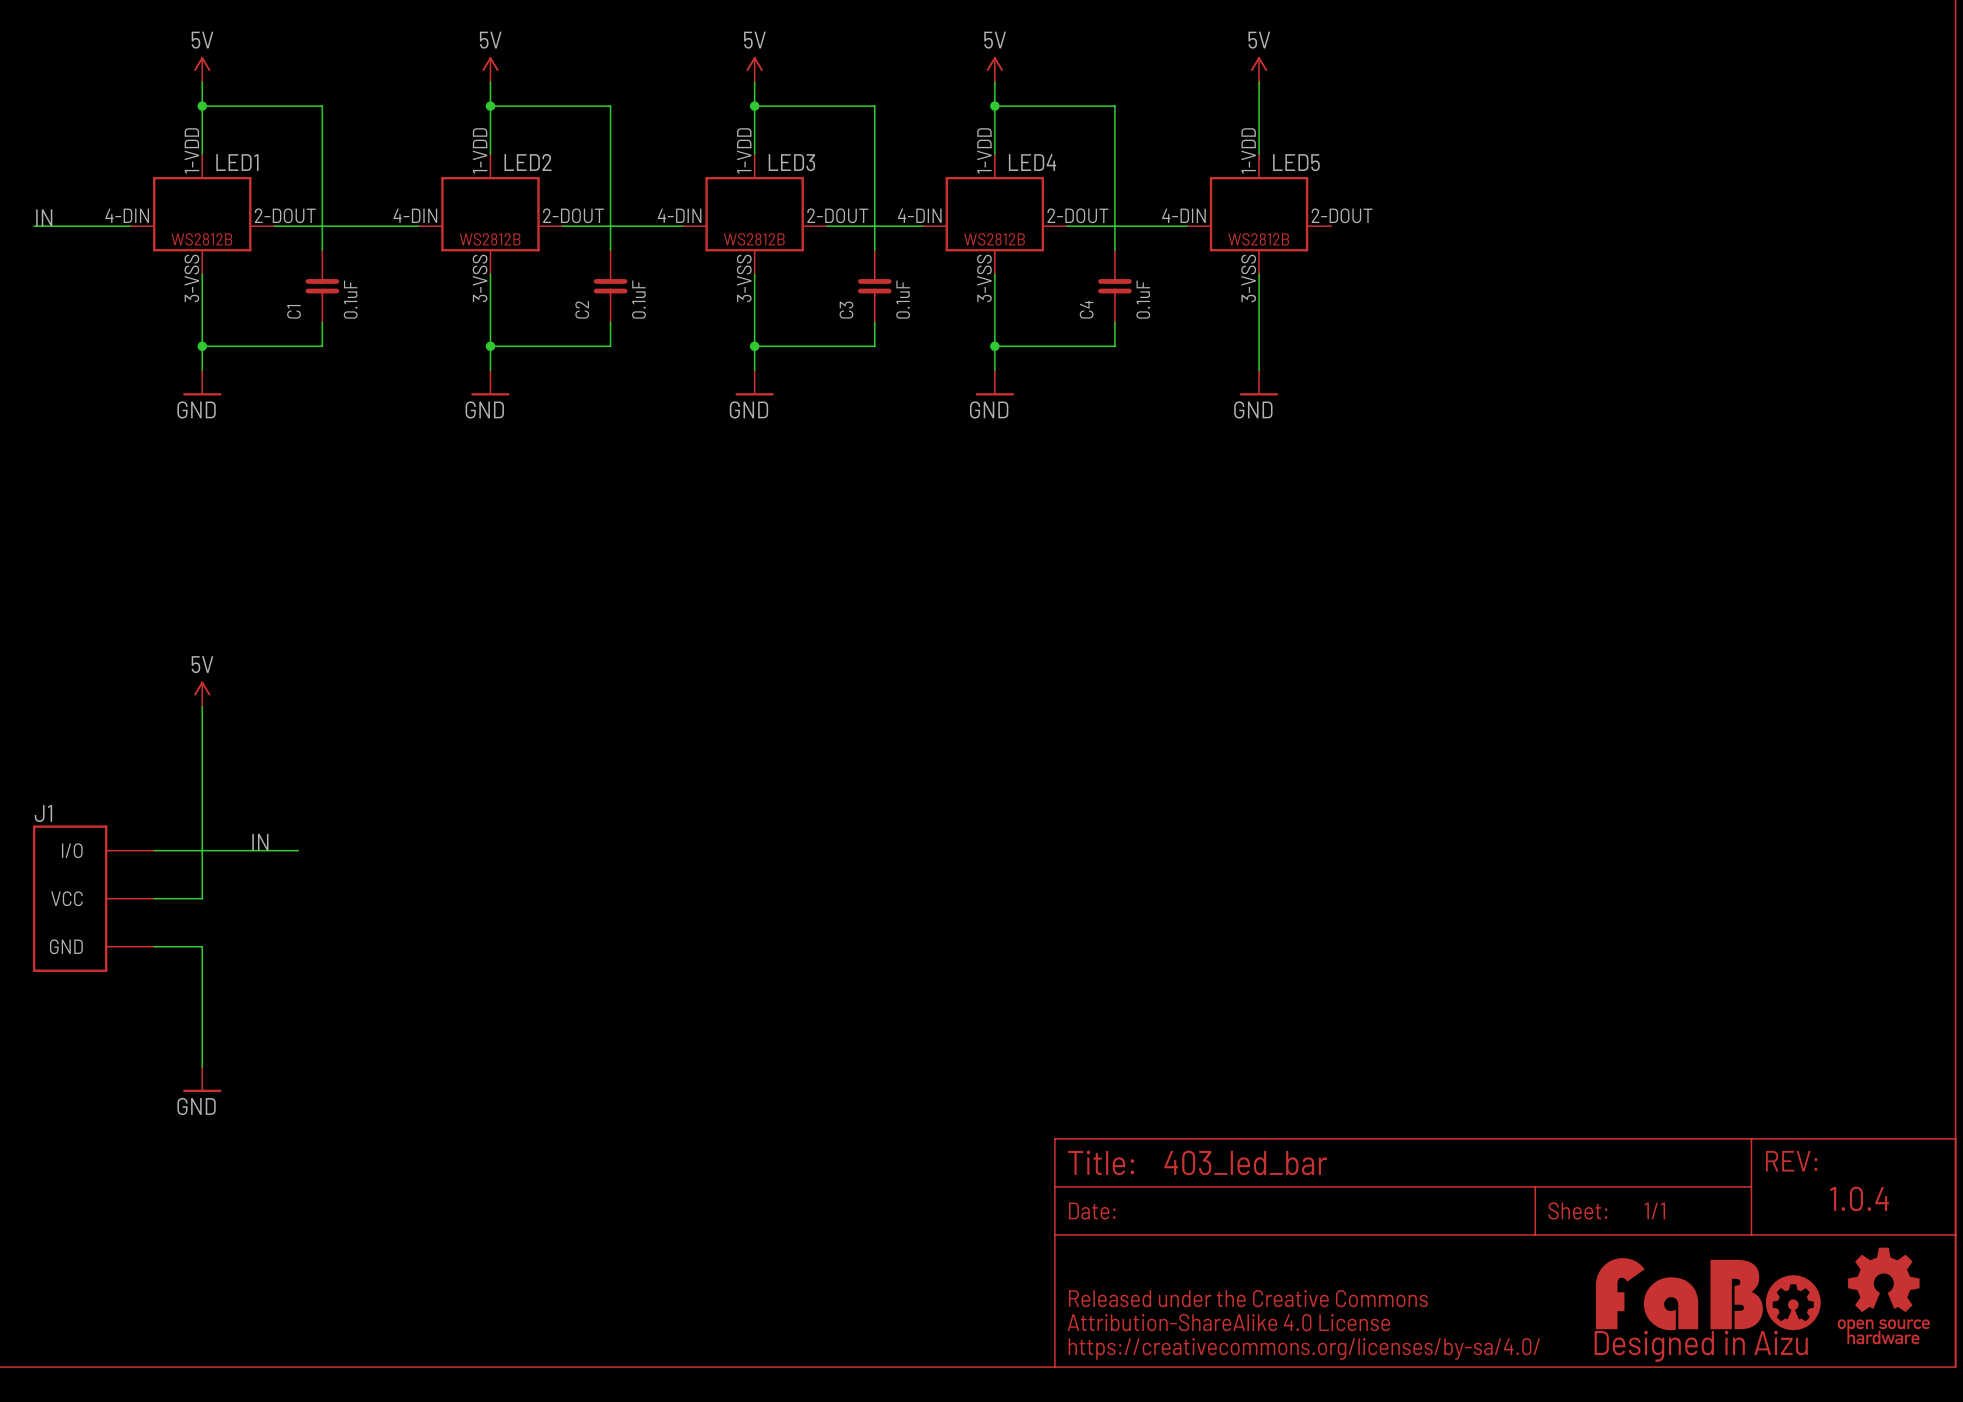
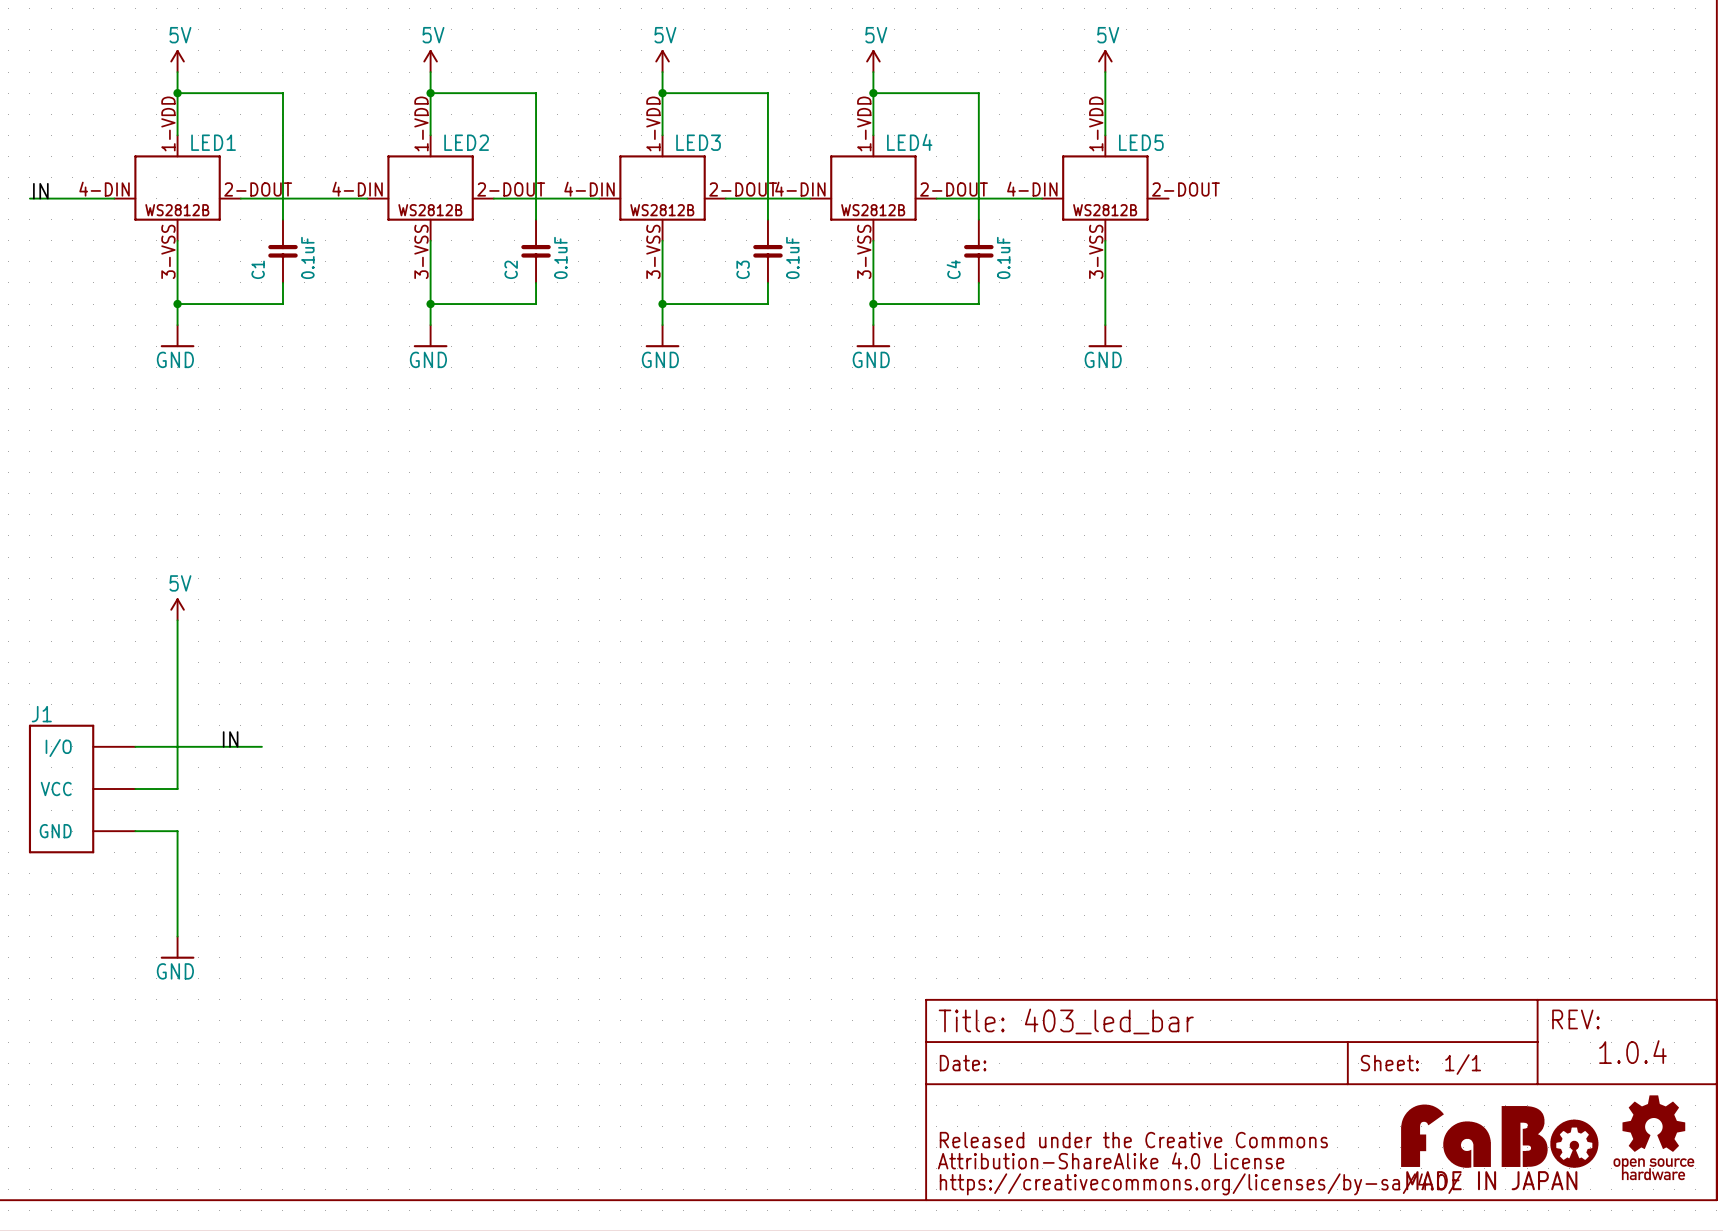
part text: none -> MADE IN JAPAN (1491, 1180)
part text: Designed in Aizu (1701, 1346) -> none

